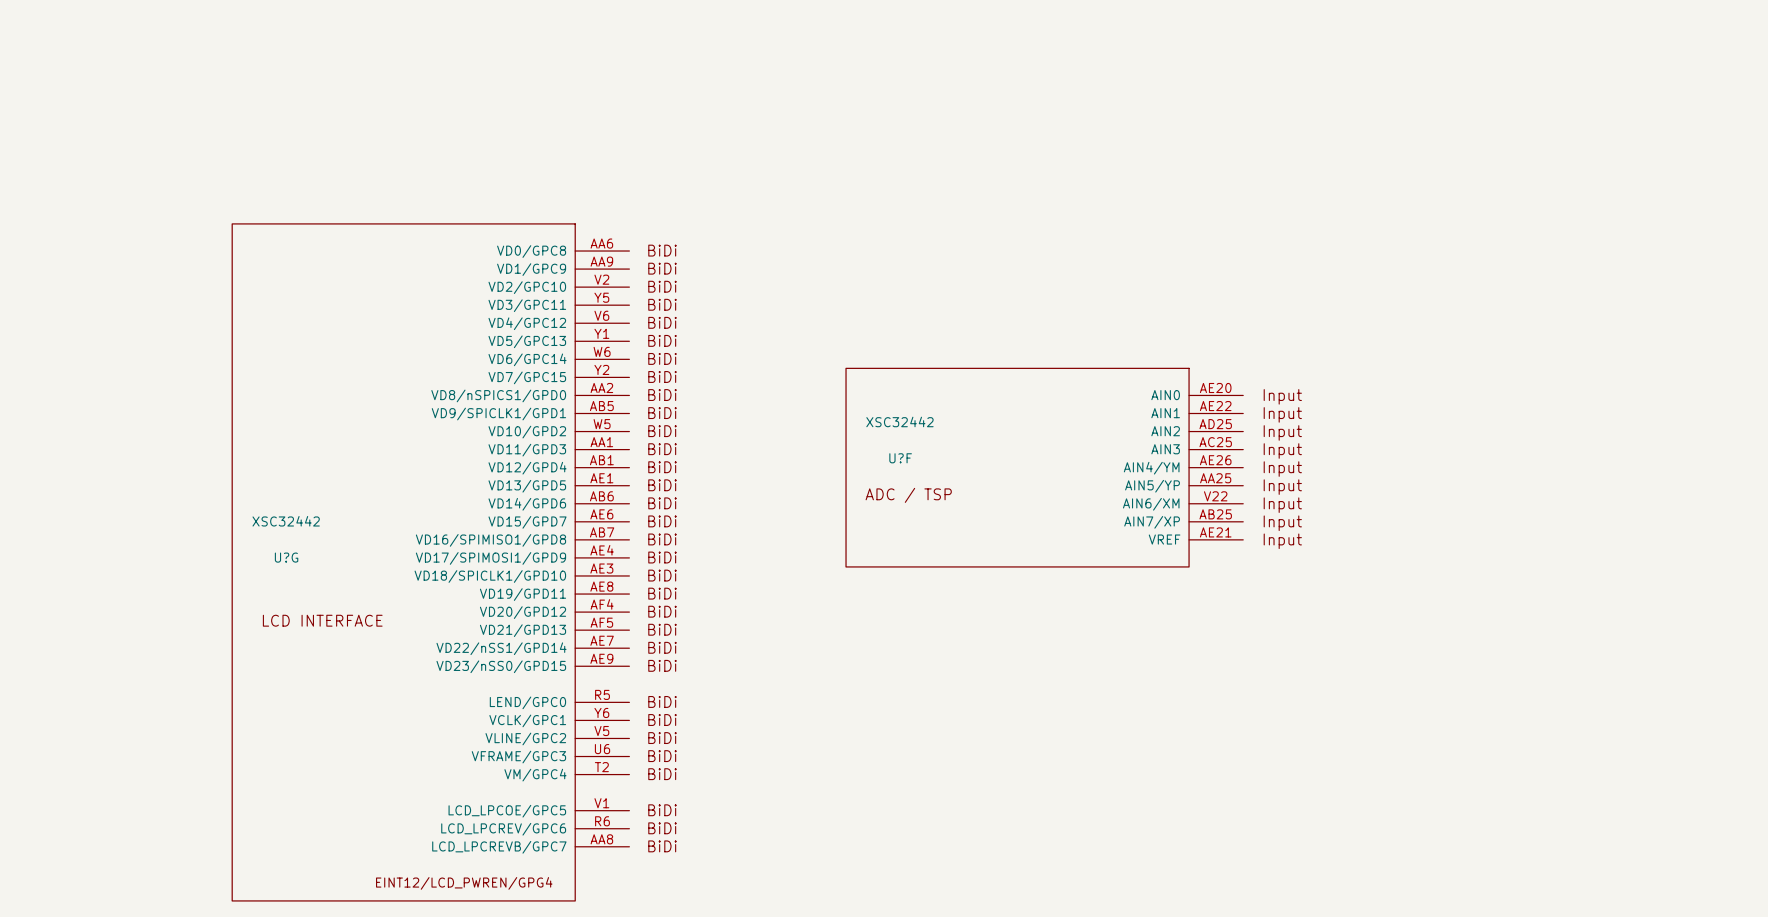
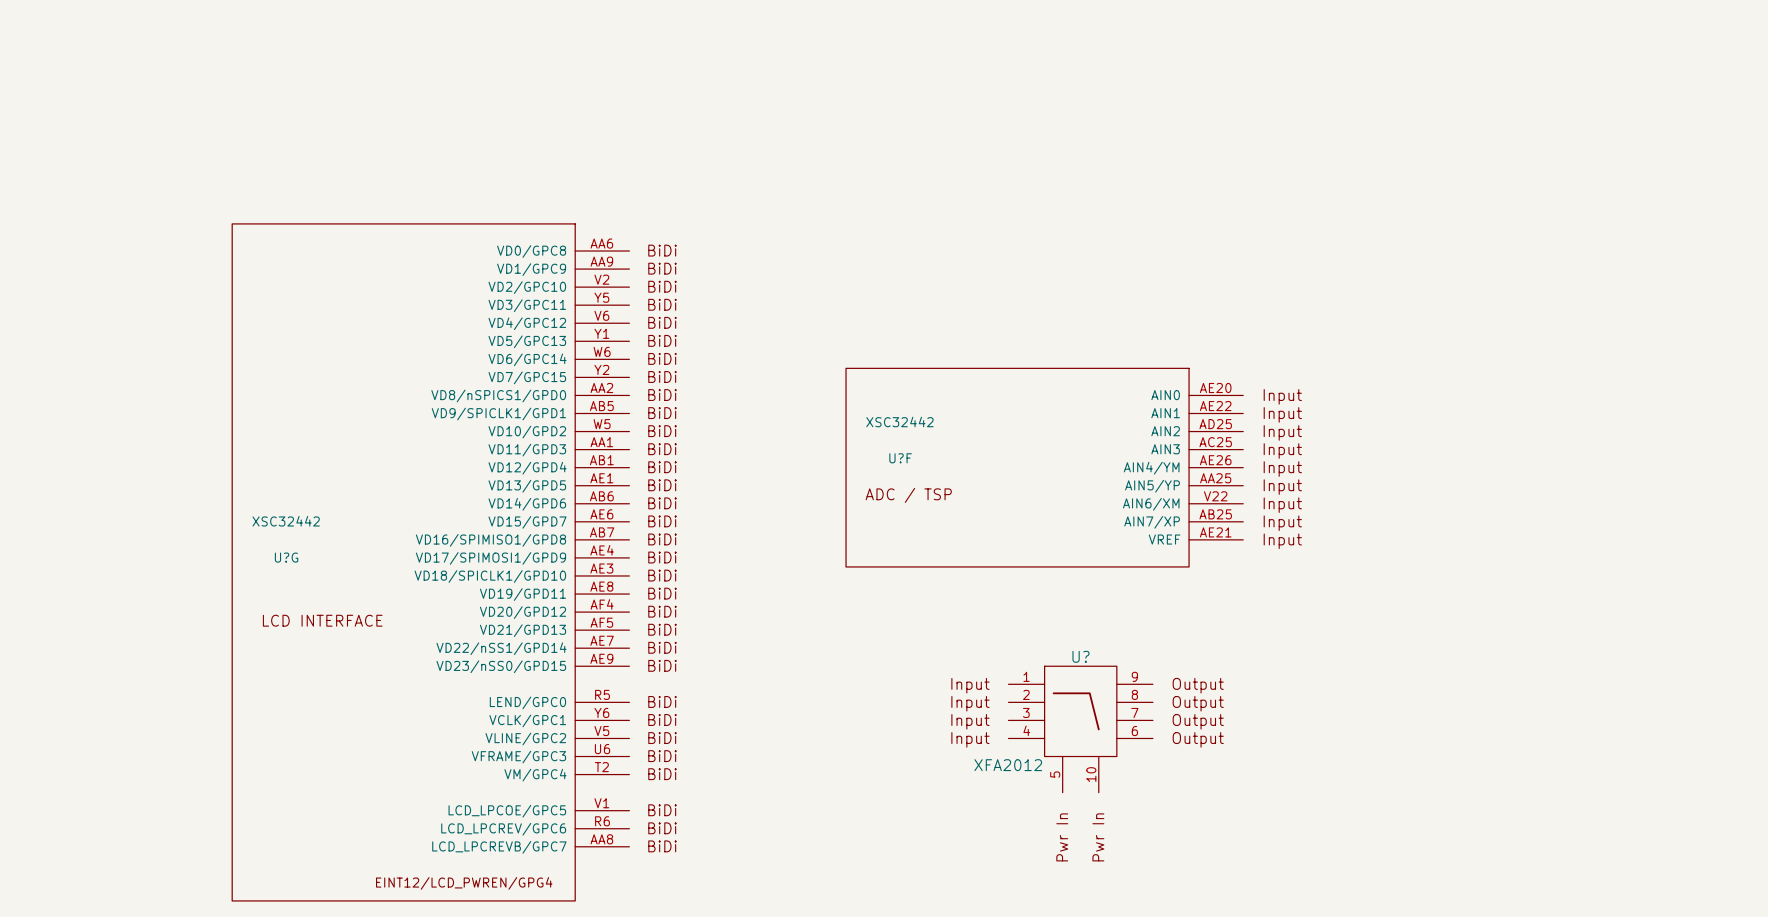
U?: none -> XFA2012 (1080, 729)

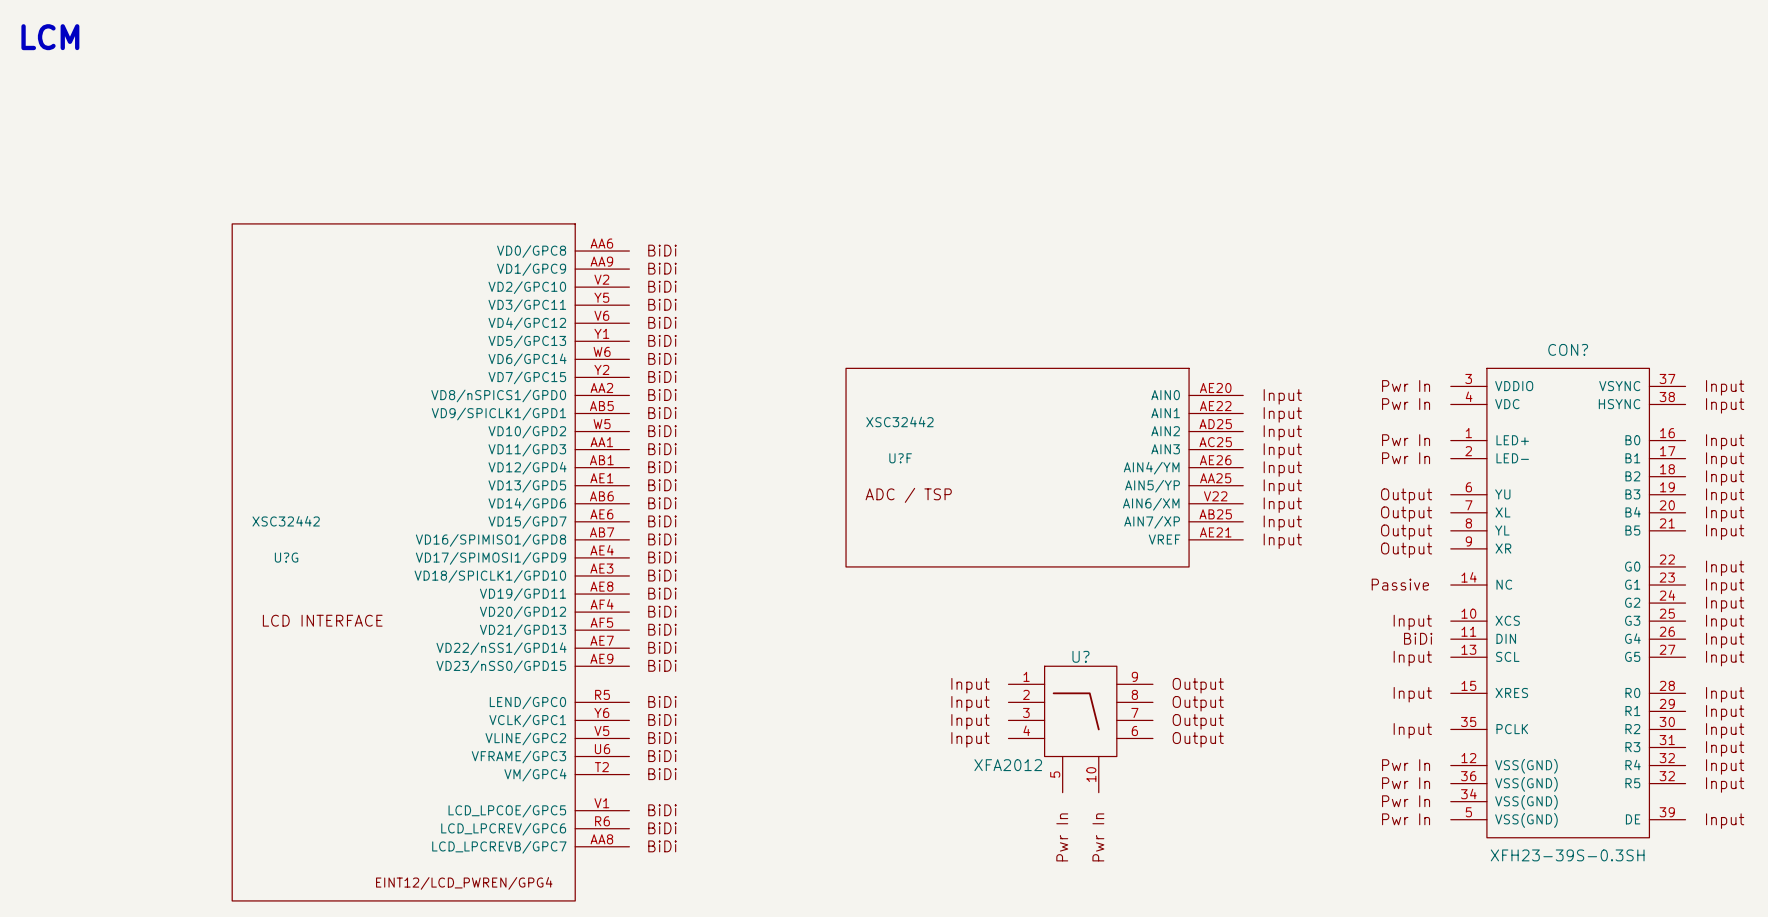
text: none -> LCM (50, 37)
CON?: none -> XFH23-39S-0.3SH (1568, 603)

